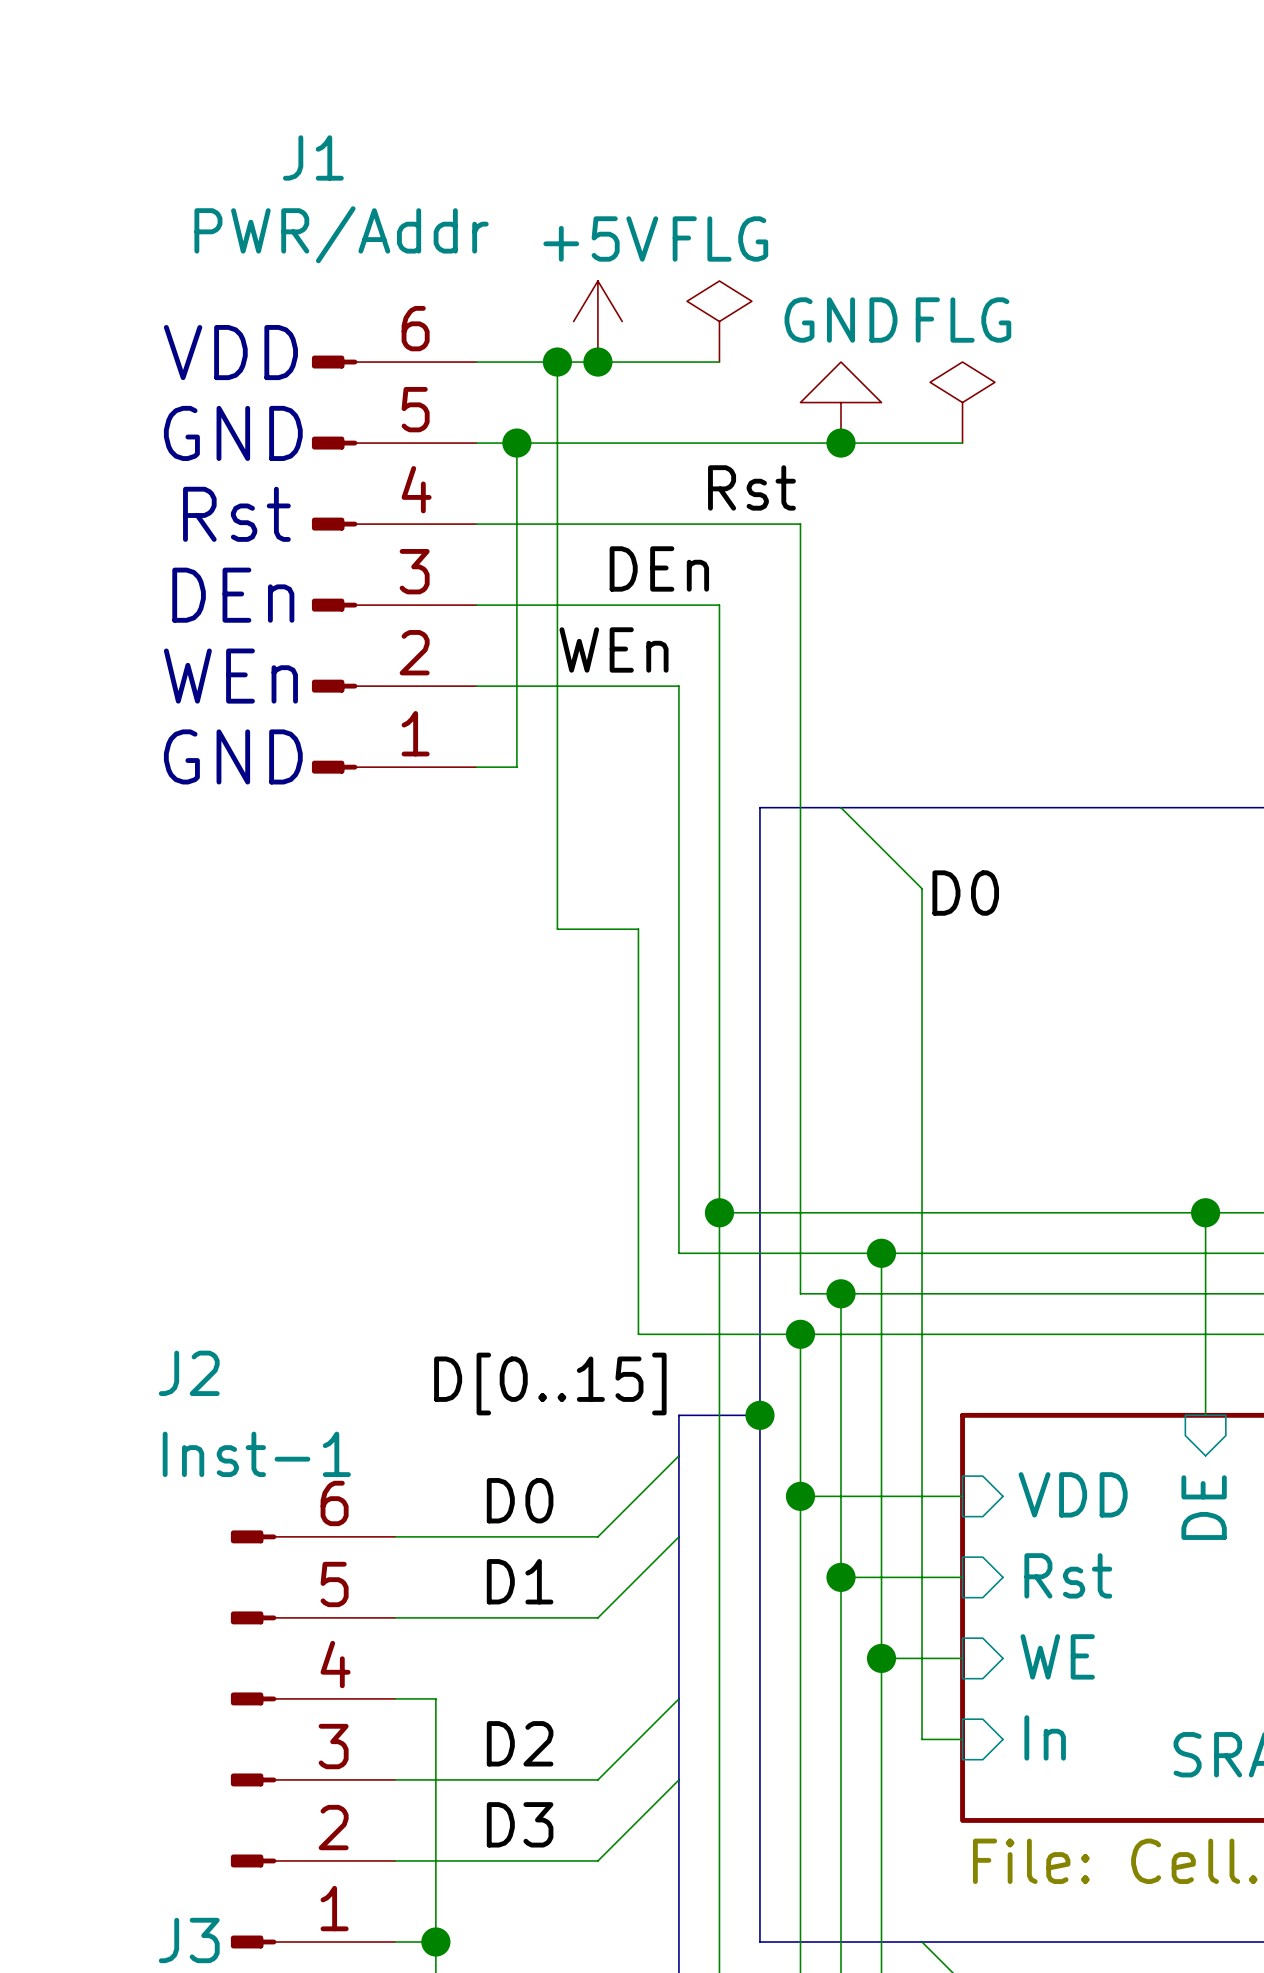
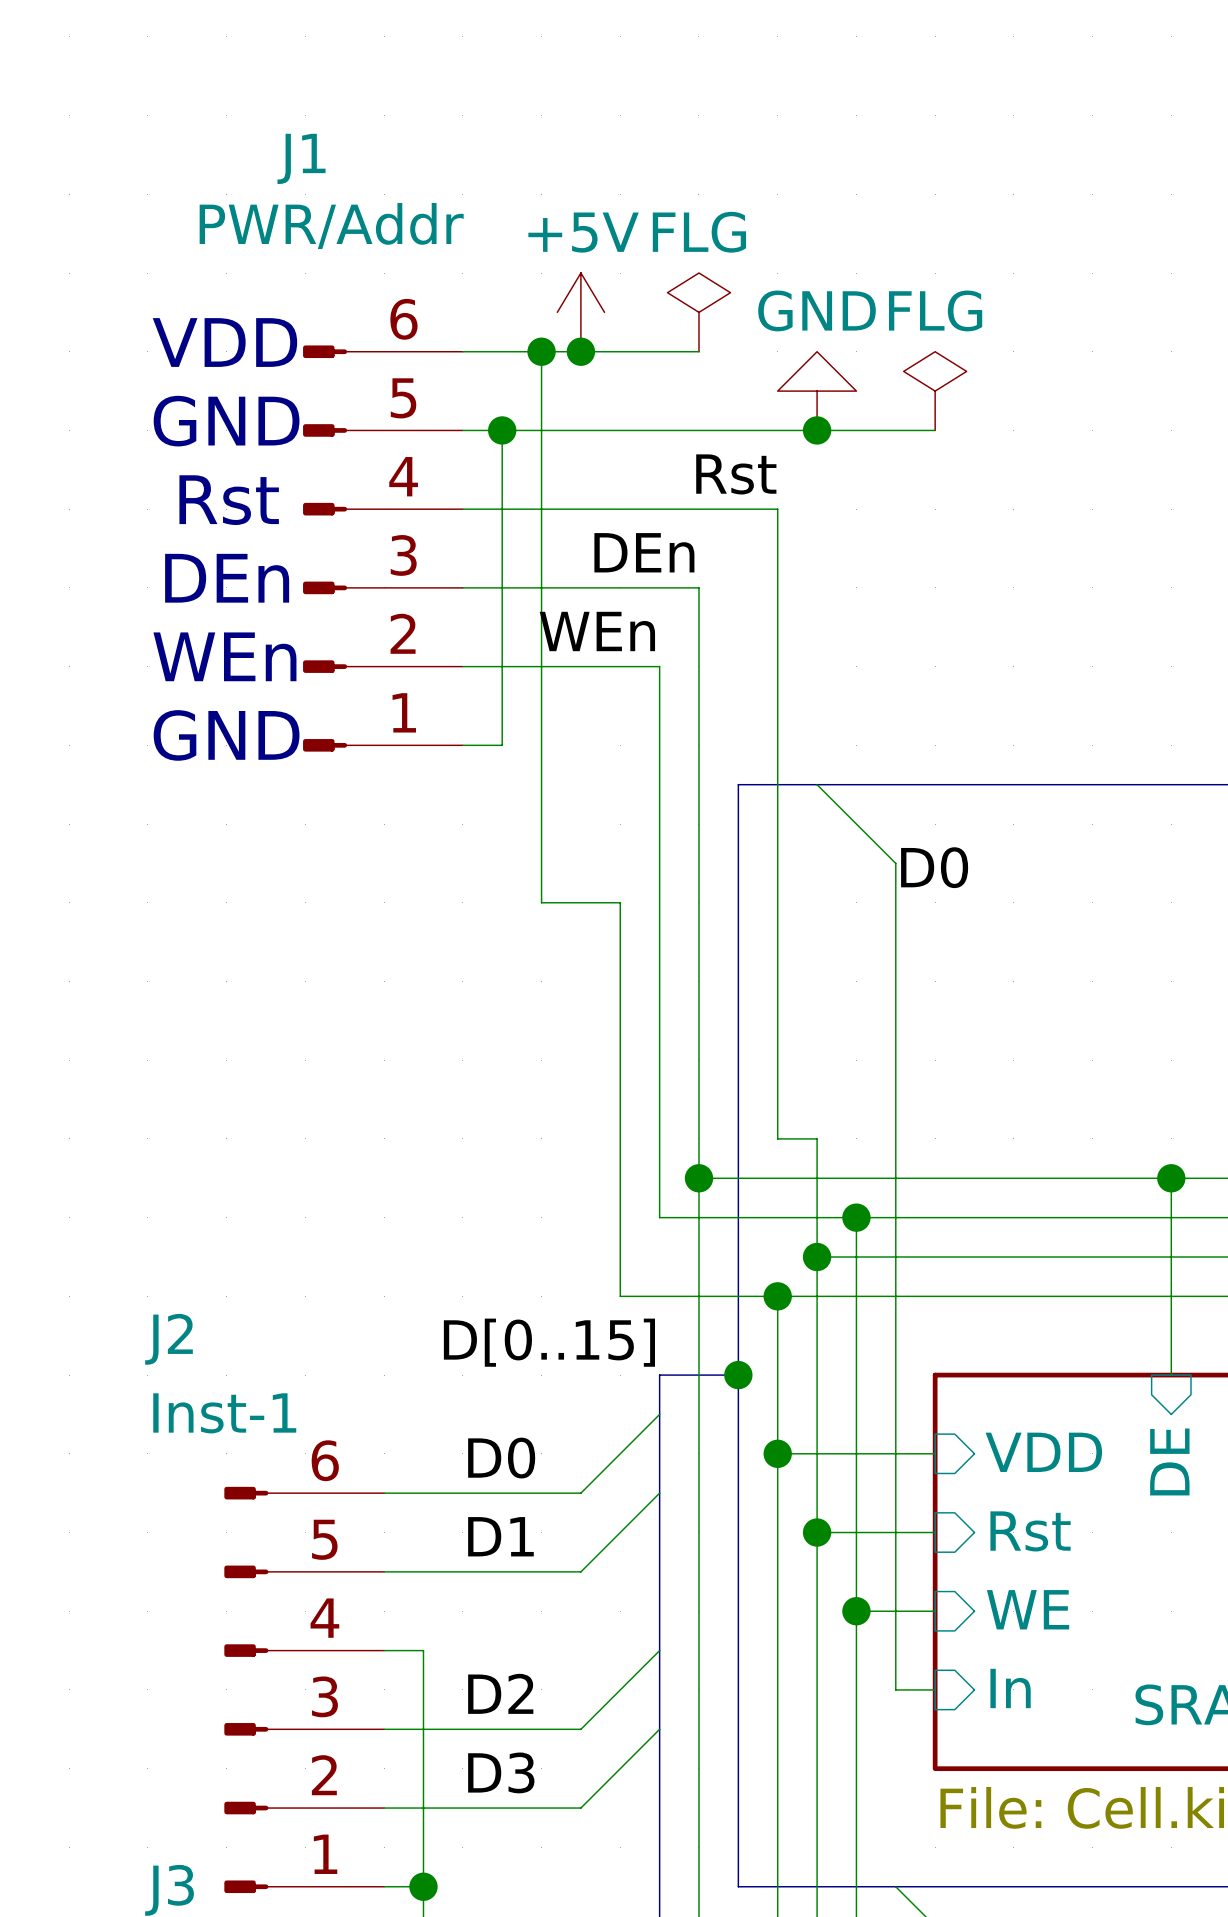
wire: (800, 1172) (800, 1293) (841, 1293) -> (777, 1138) (817, 1138) (817, 1257)

